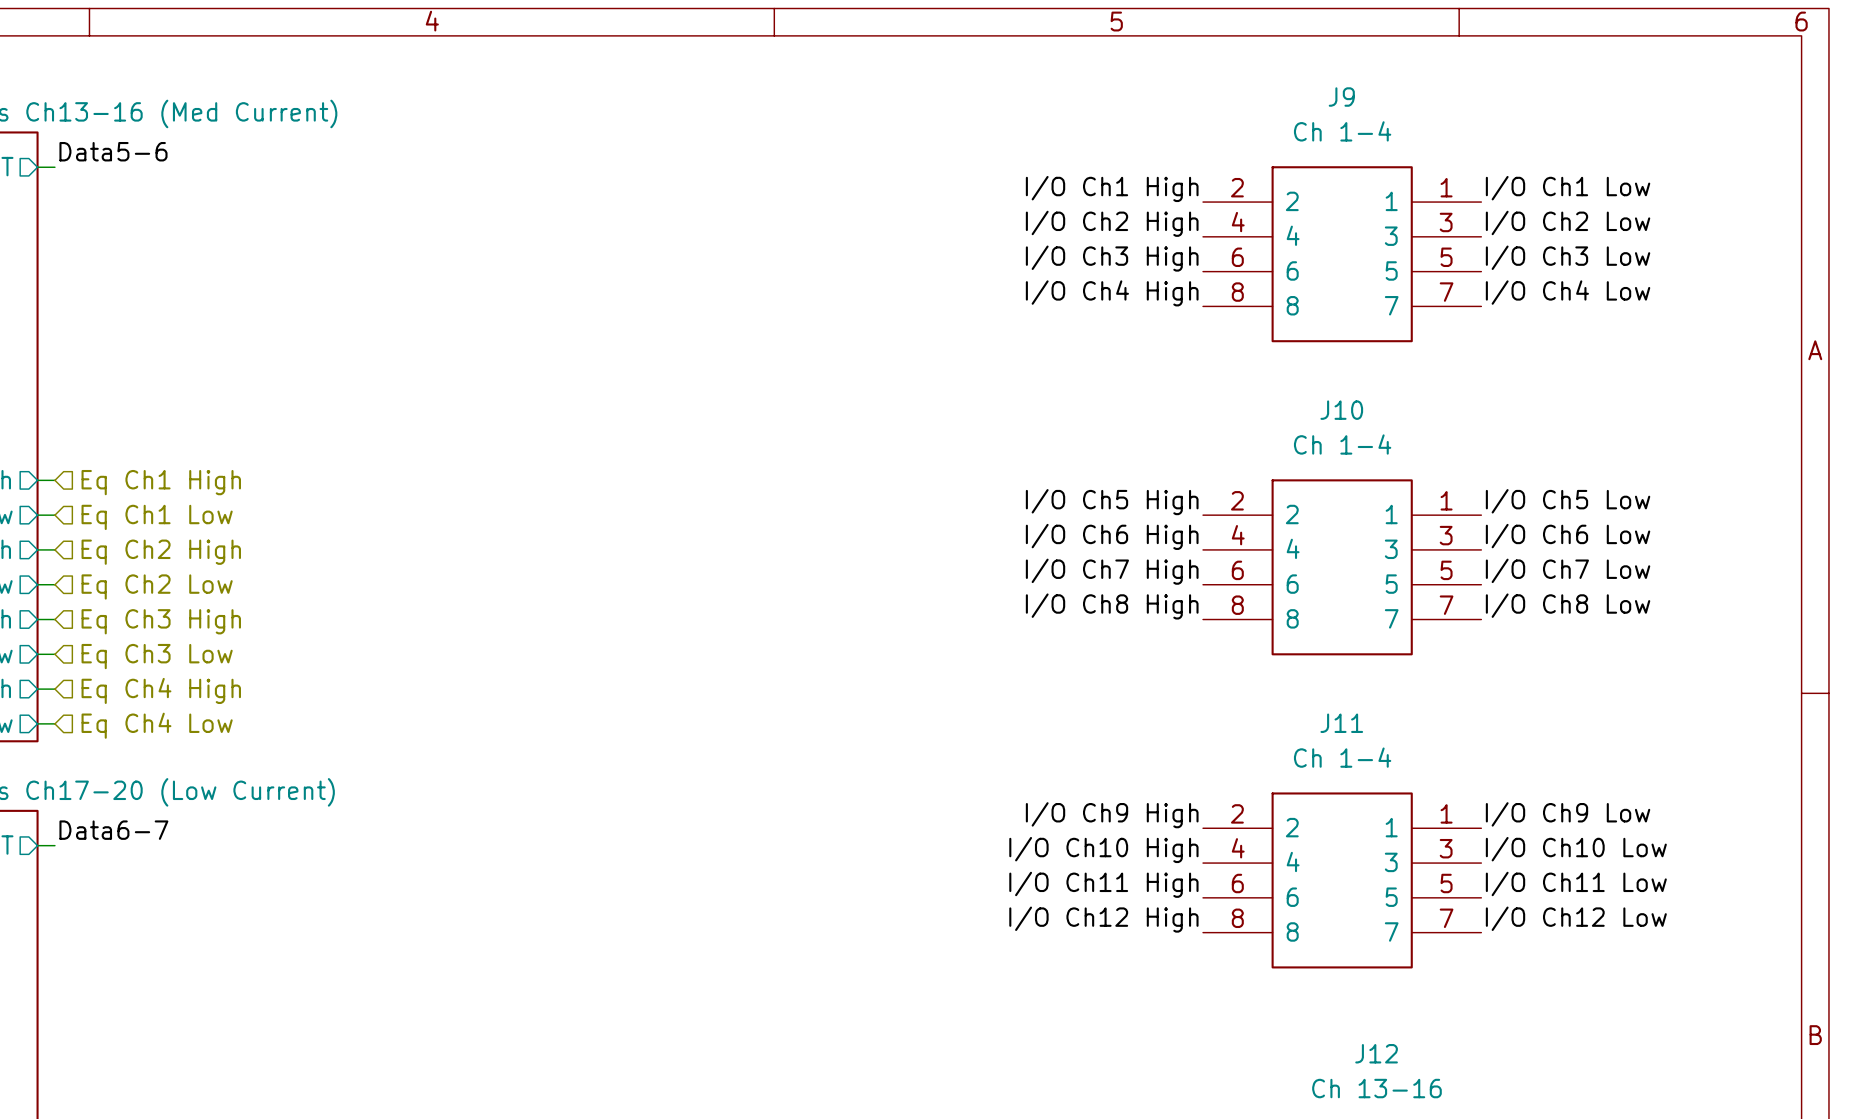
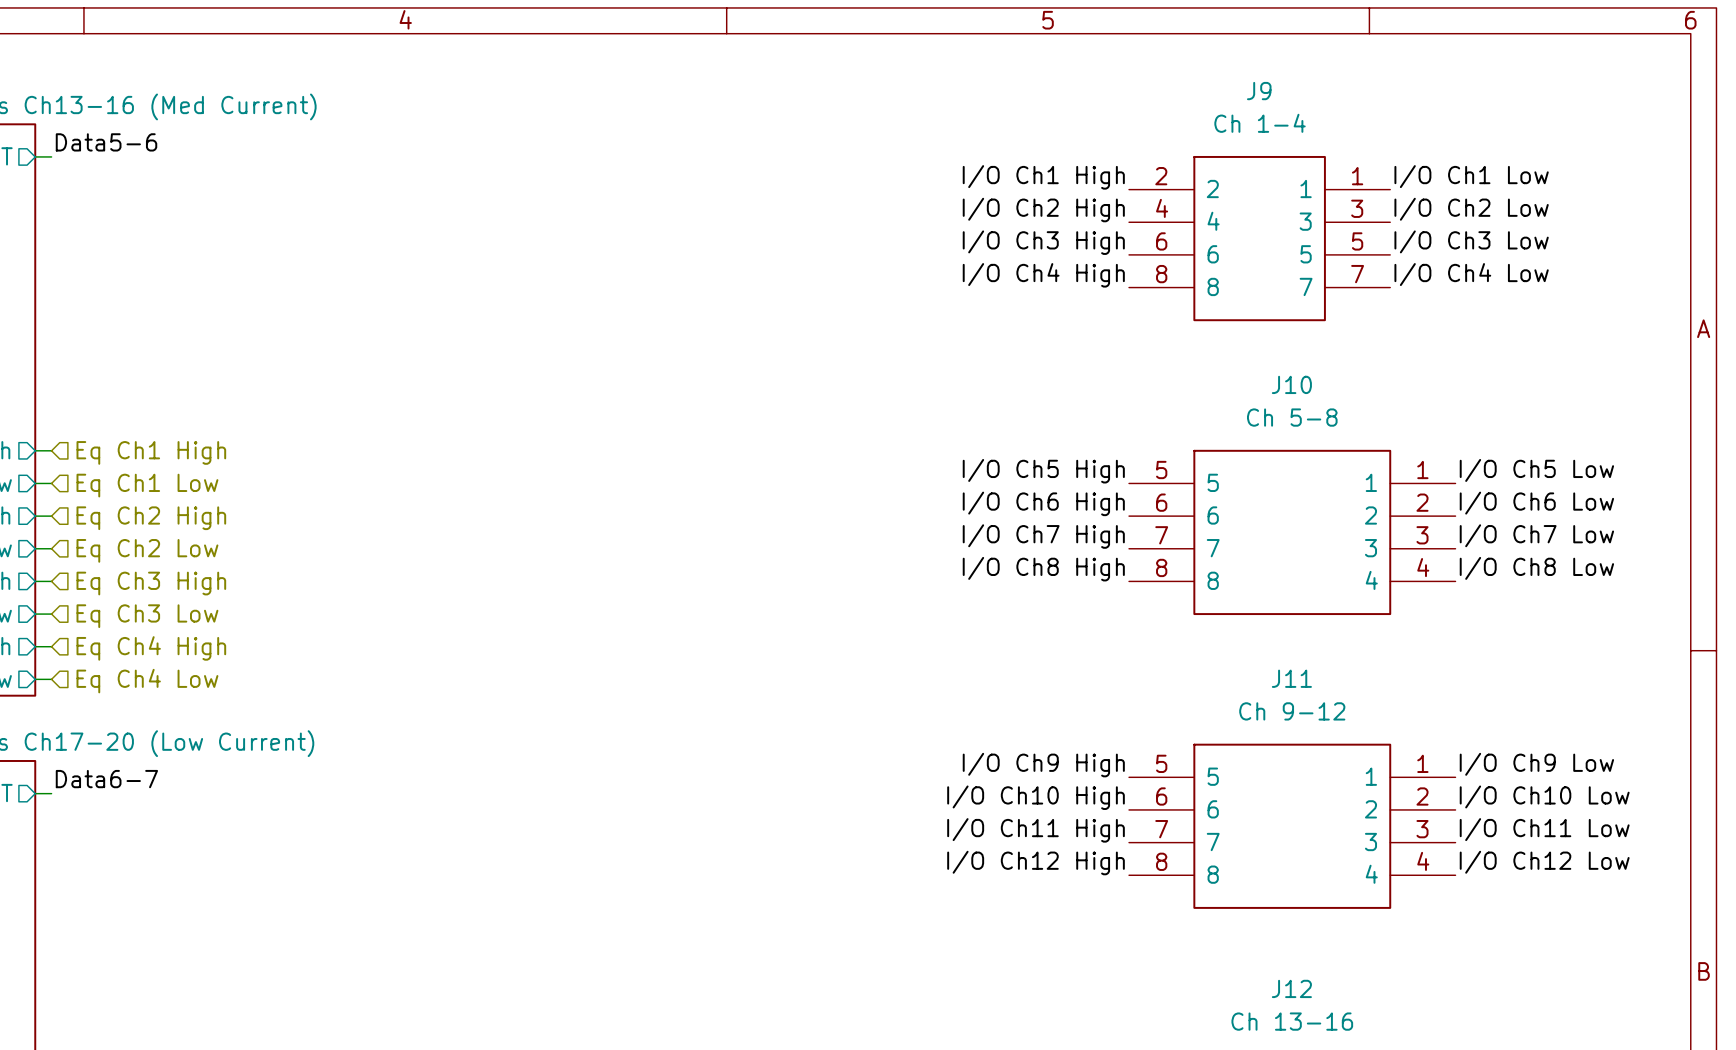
J10 value: Ch 1-4 (1342, 444) -> Ch 5-8 (1292, 417)
J10 symbol: [1203, 479, 1482, 656] -> [1129, 449, 1456, 616]
label position: I/O Ch5 Low (1568, 501) -> I/O Ch5 Low (1536, 470)
label position: I/O Ch6 Low (1568, 536) -> I/O Ch6 Low (1536, 503)
label position: I/O Ch7 Low (1568, 570) -> I/O Ch7 Low (1536, 535)
label position: I/O Ch8 Low (1568, 605) -> I/O Ch8 Low (1536, 568)
J11 value: Ch 1-4 (1342, 757) -> Ch 9-12 (1292, 711)
J11 symbol: [1203, 792, 1482, 969] -> [1129, 743, 1456, 909]
label position: I/O Ch9 Low (1568, 814) -> I/O Ch9 Low (1536, 764)
label position: I/O Ch10 Low (1576, 849) -> I/O Ch10 Low (1544, 796)
label position: I/O Ch11 Low (1576, 883) -> I/O Ch11 Low (1544, 829)
label position: I/O Ch12 Low (1576, 918) -> I/O Ch12 Low (1544, 862)

